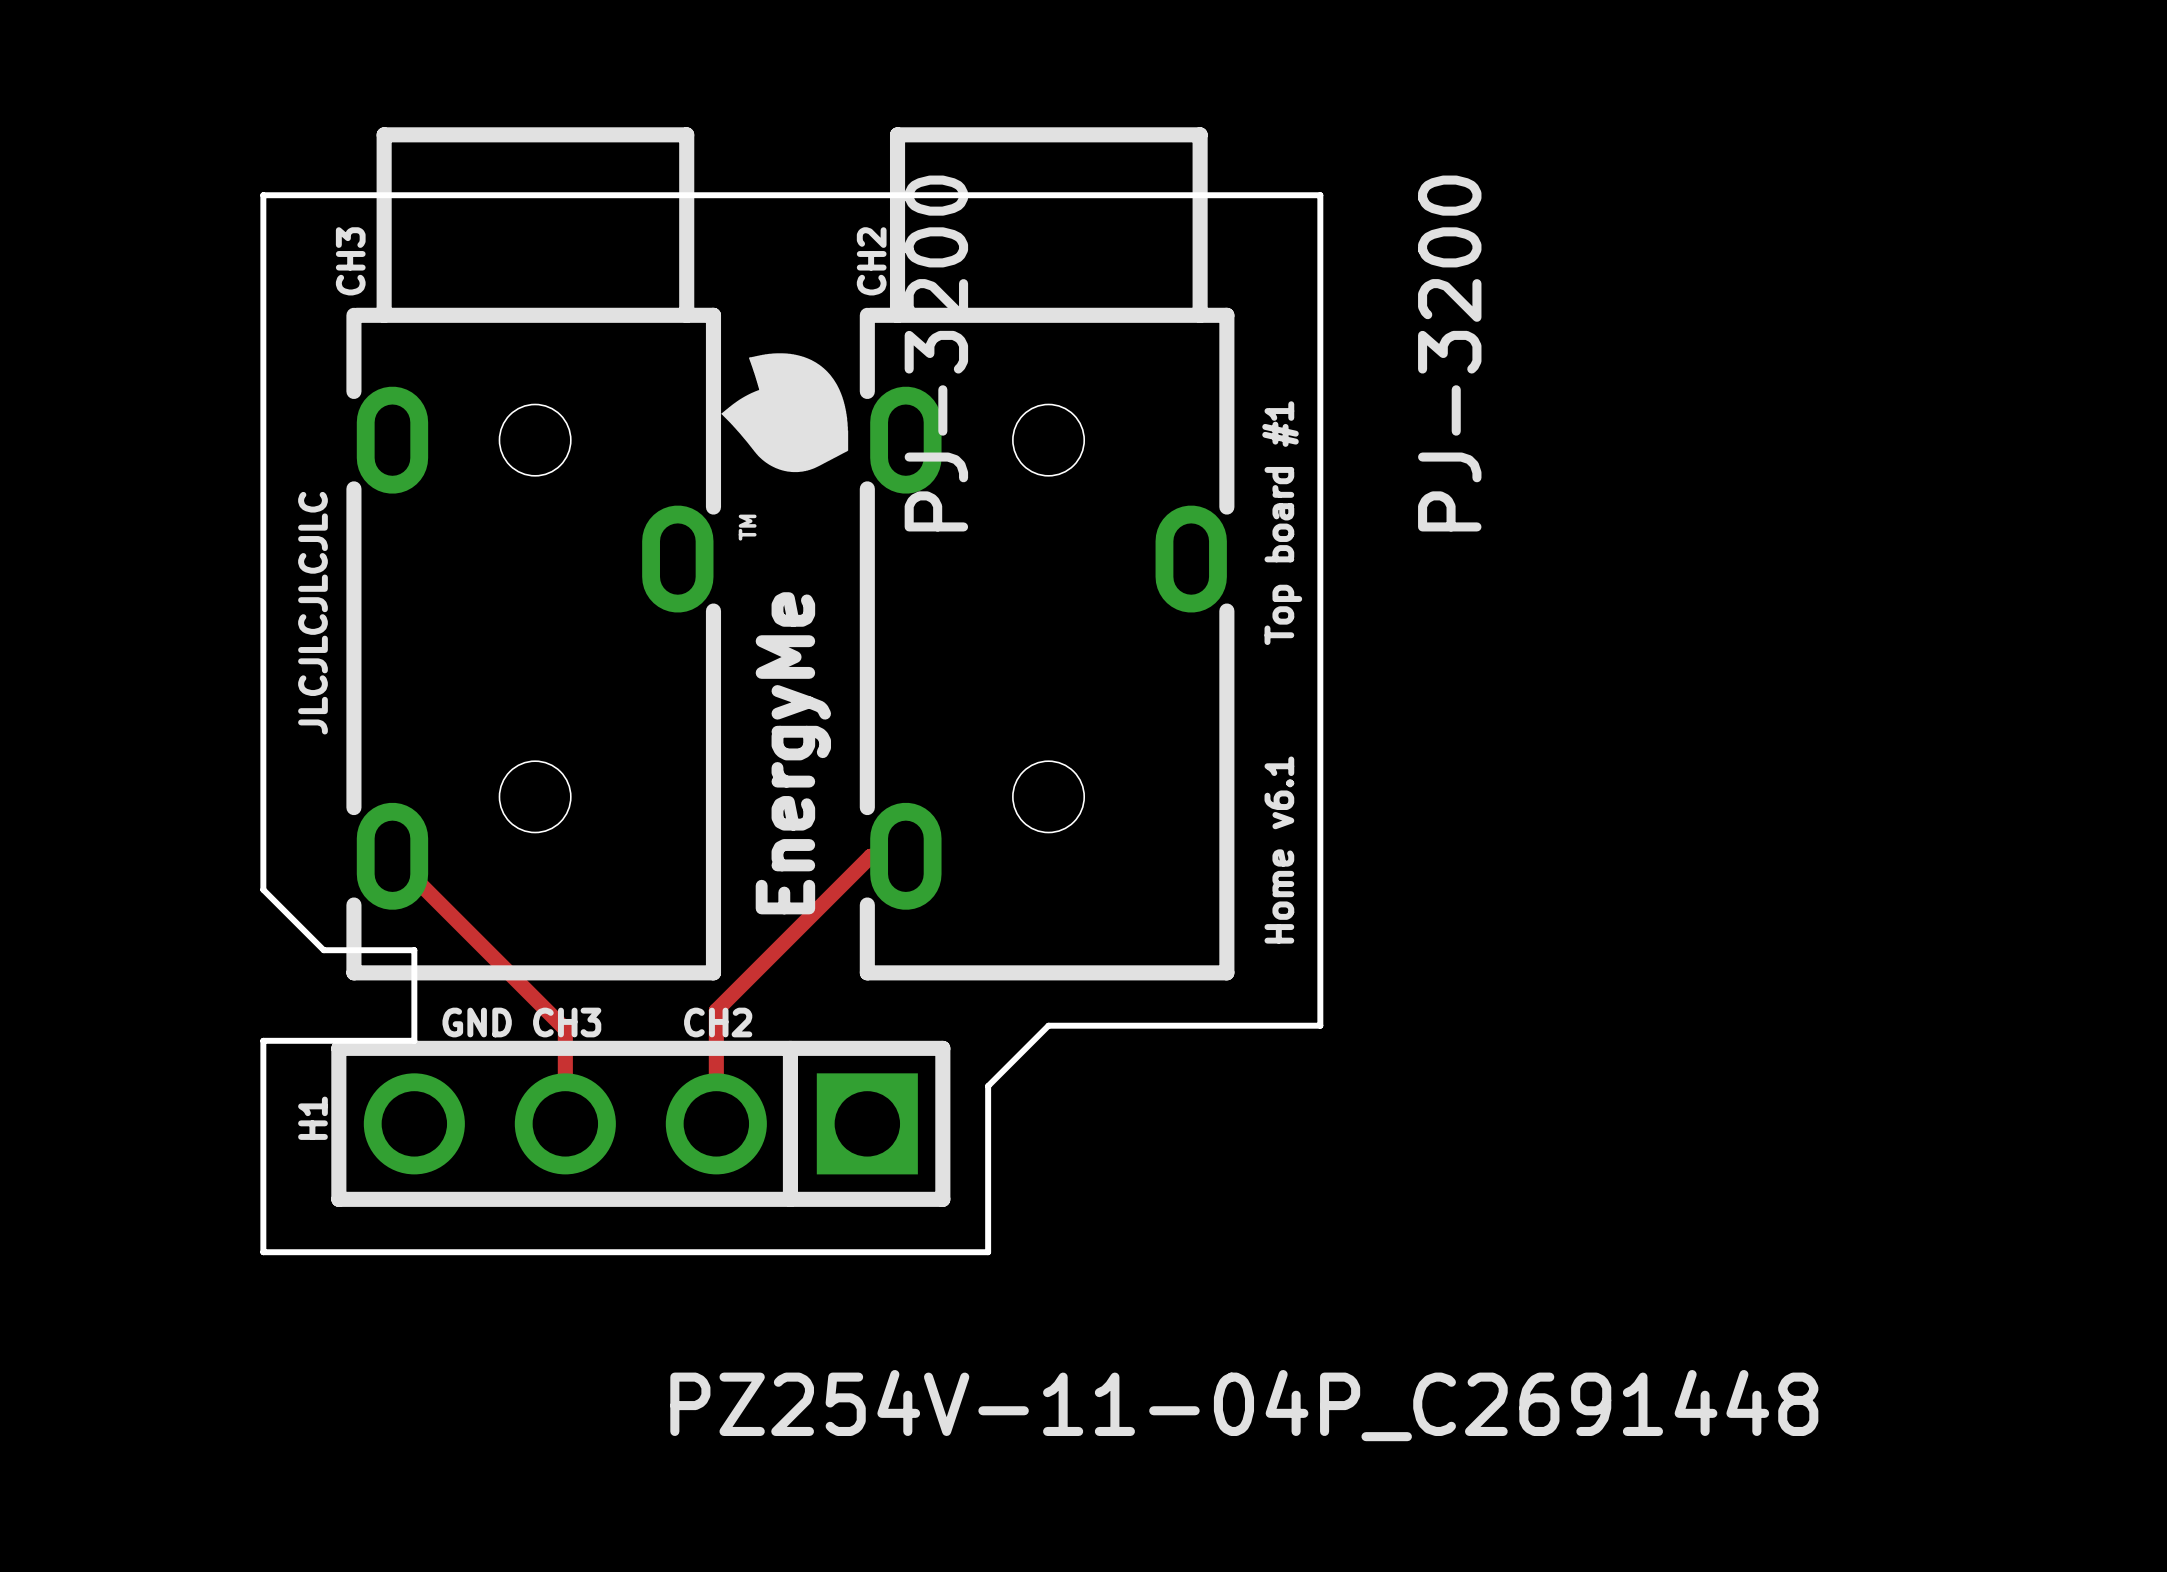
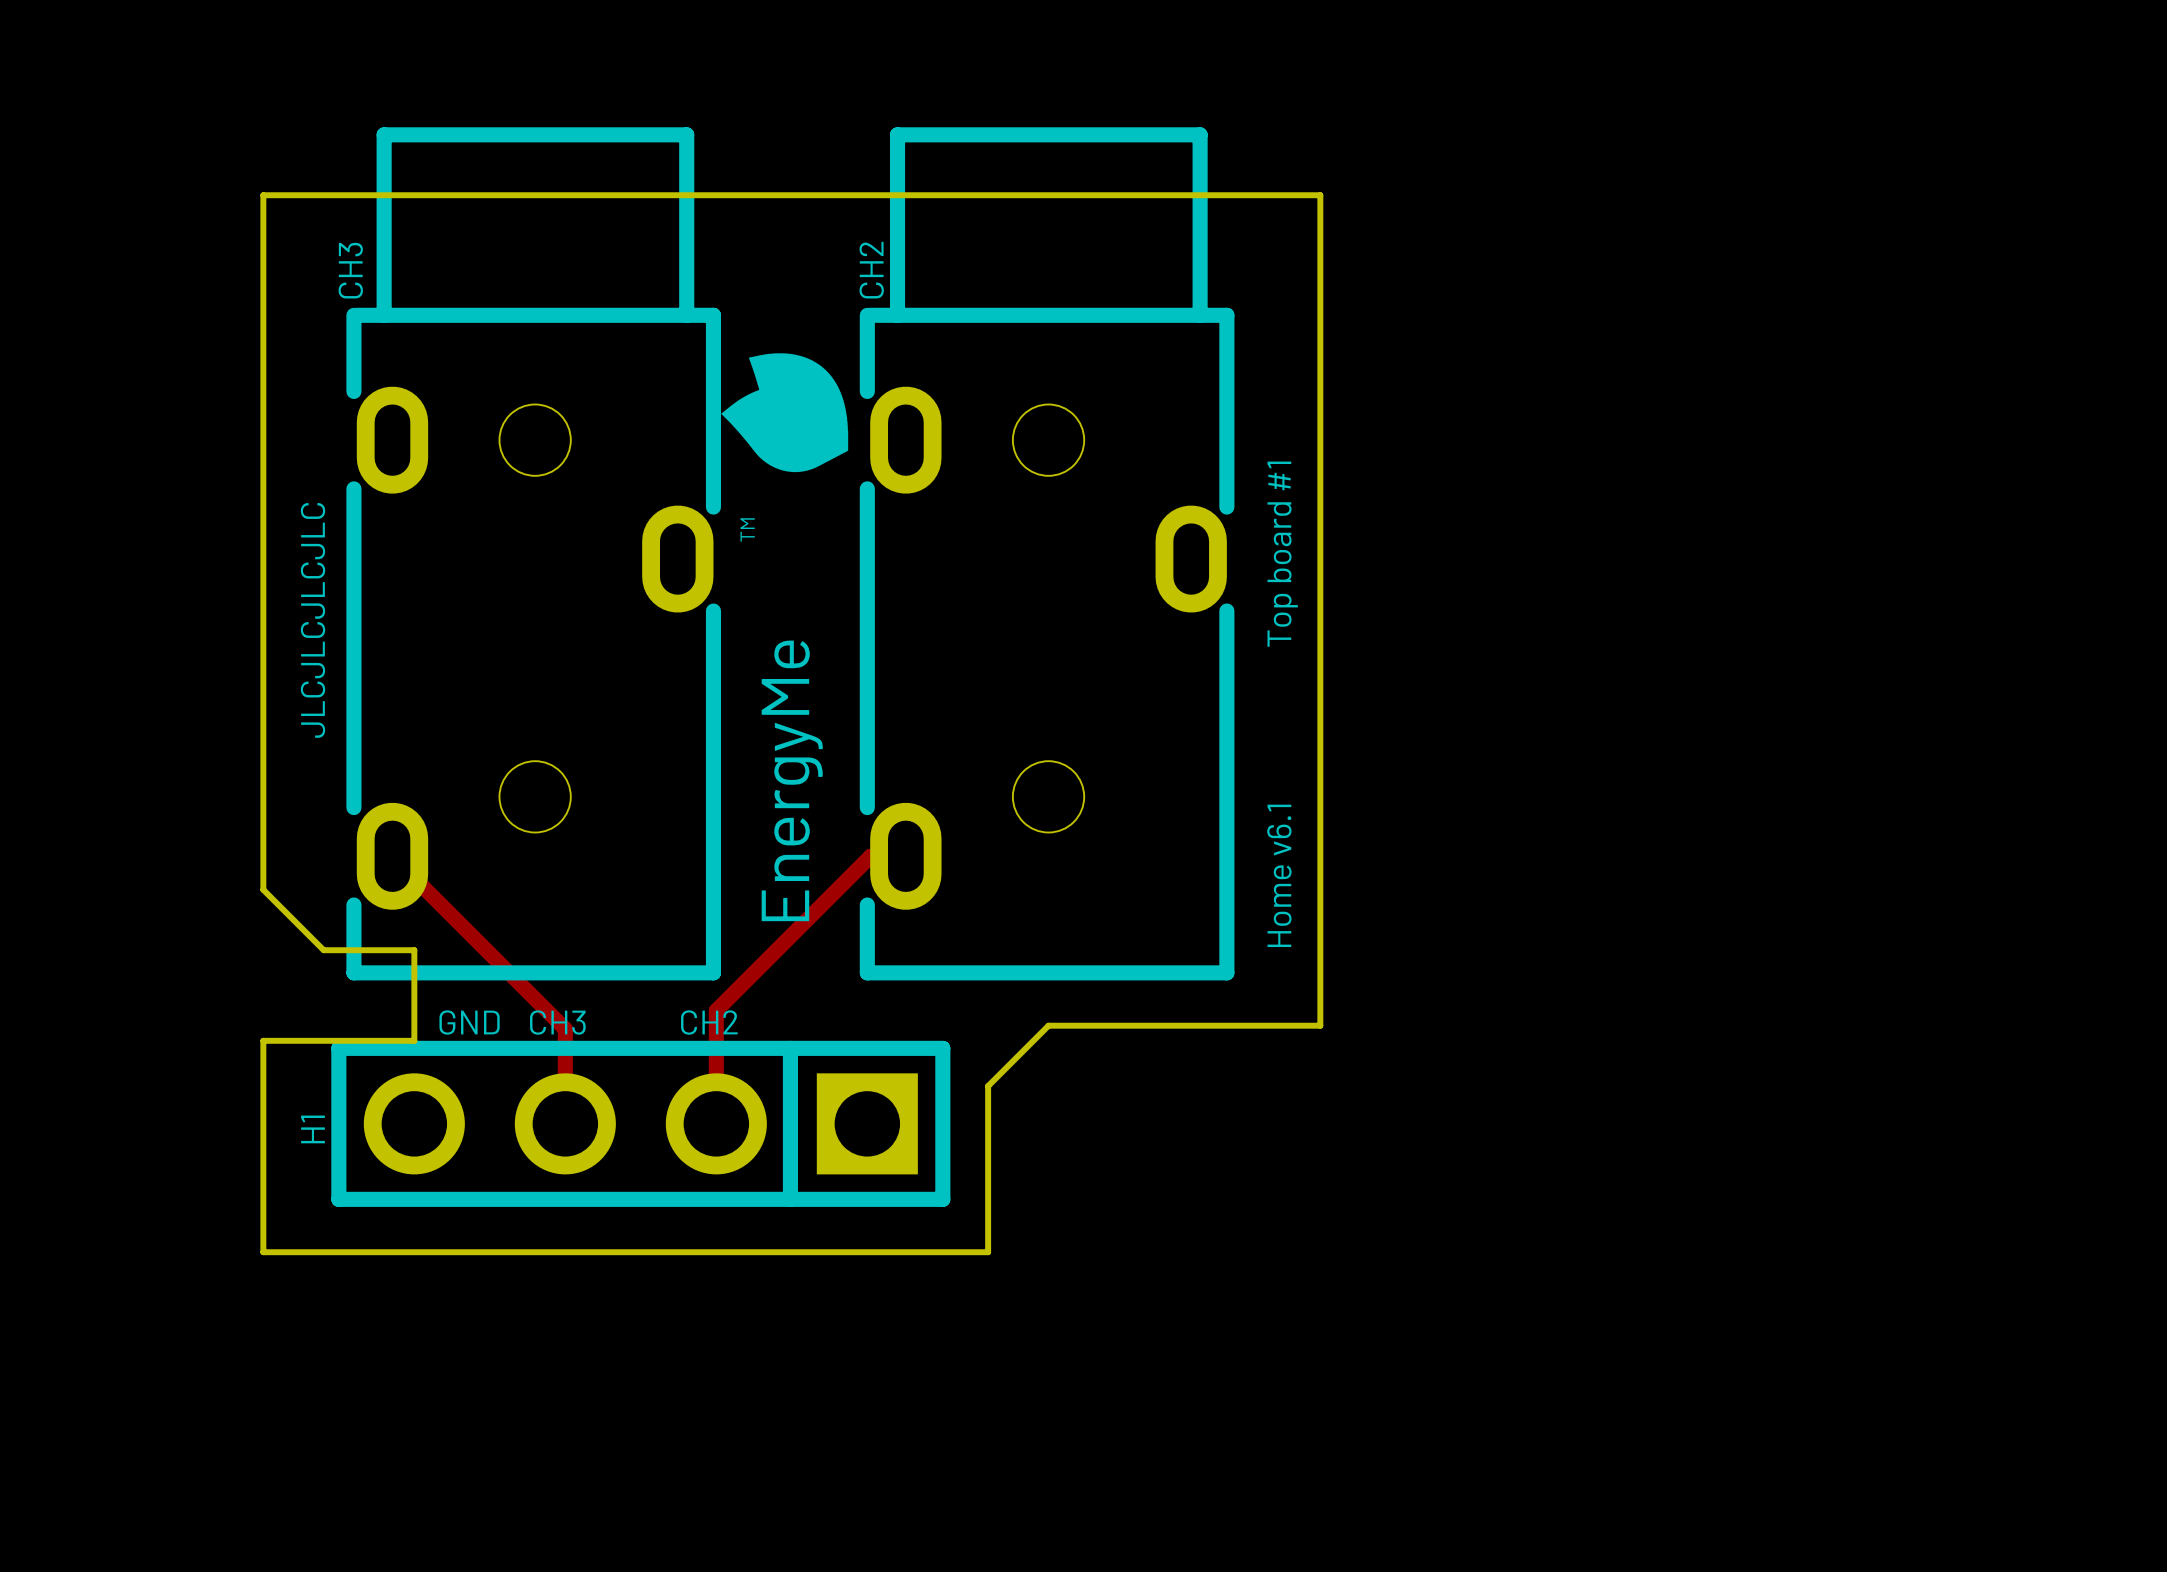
CH3 value: PJ-3200 (936, 353) -> none
CH2 value: PJ-3200 (1449, 353) -> none
H1 value: PZ254V-11-04P_C2691448 (1244, 1405) -> none

